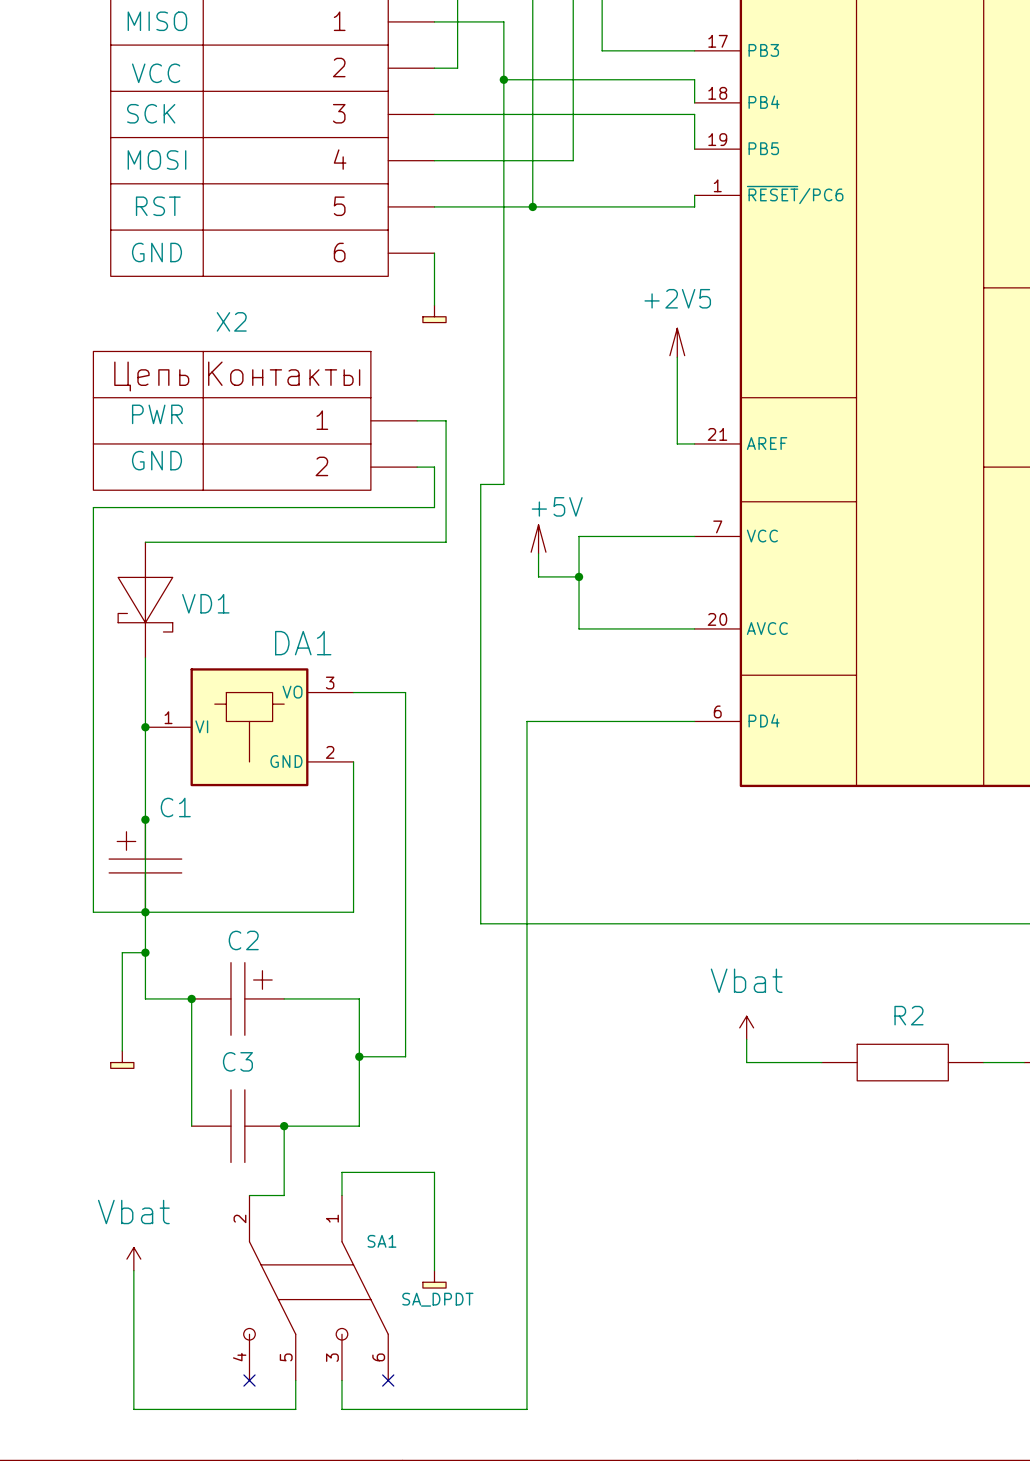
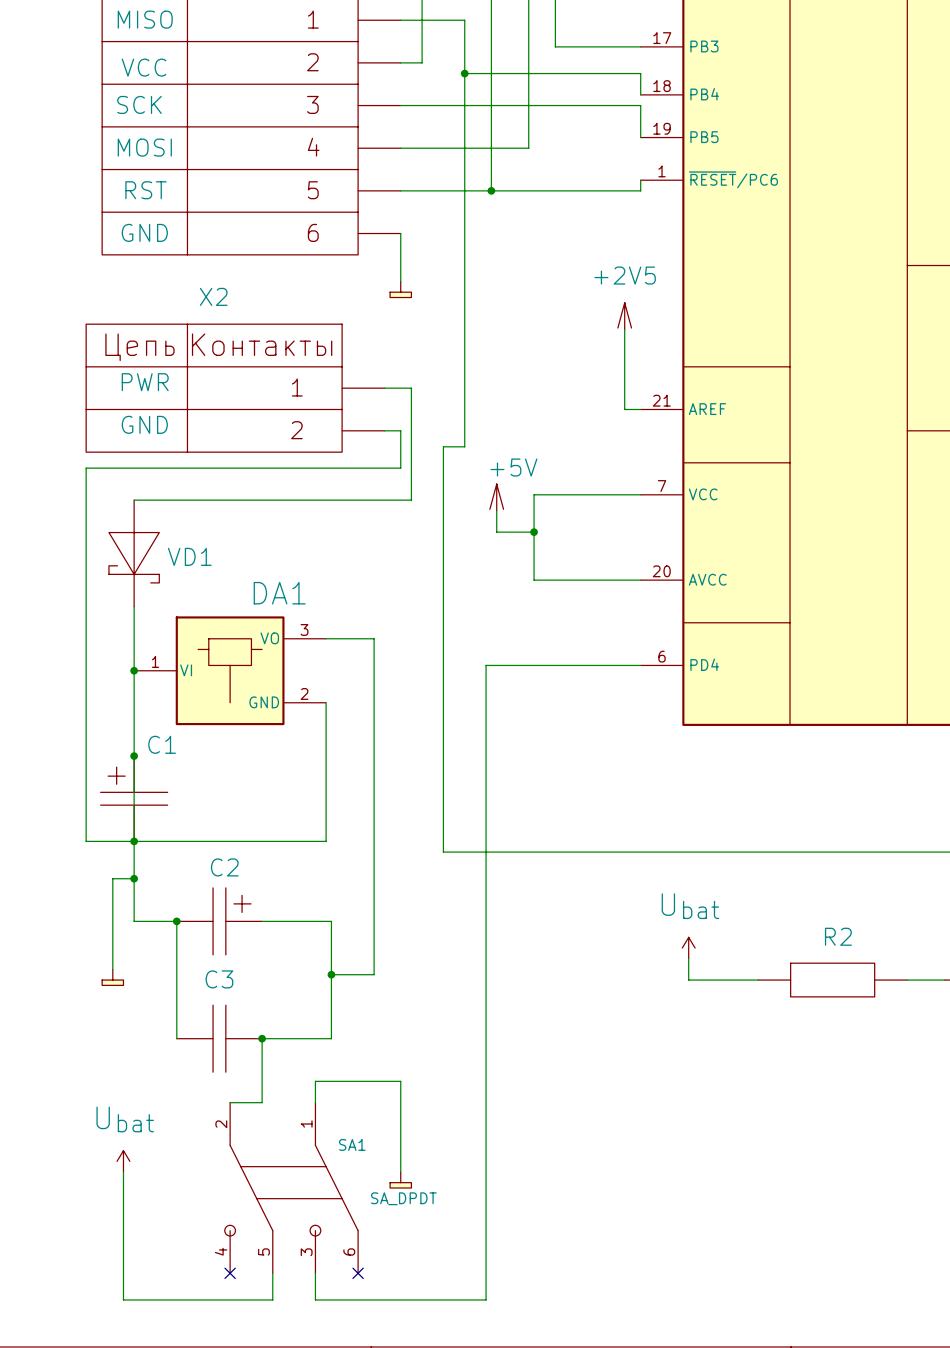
power symbol: Vbat (746, 1027) -> Ubat (688, 948)
power symbol: Vbat (133, 1259) -> Ubat (123, 1161)

